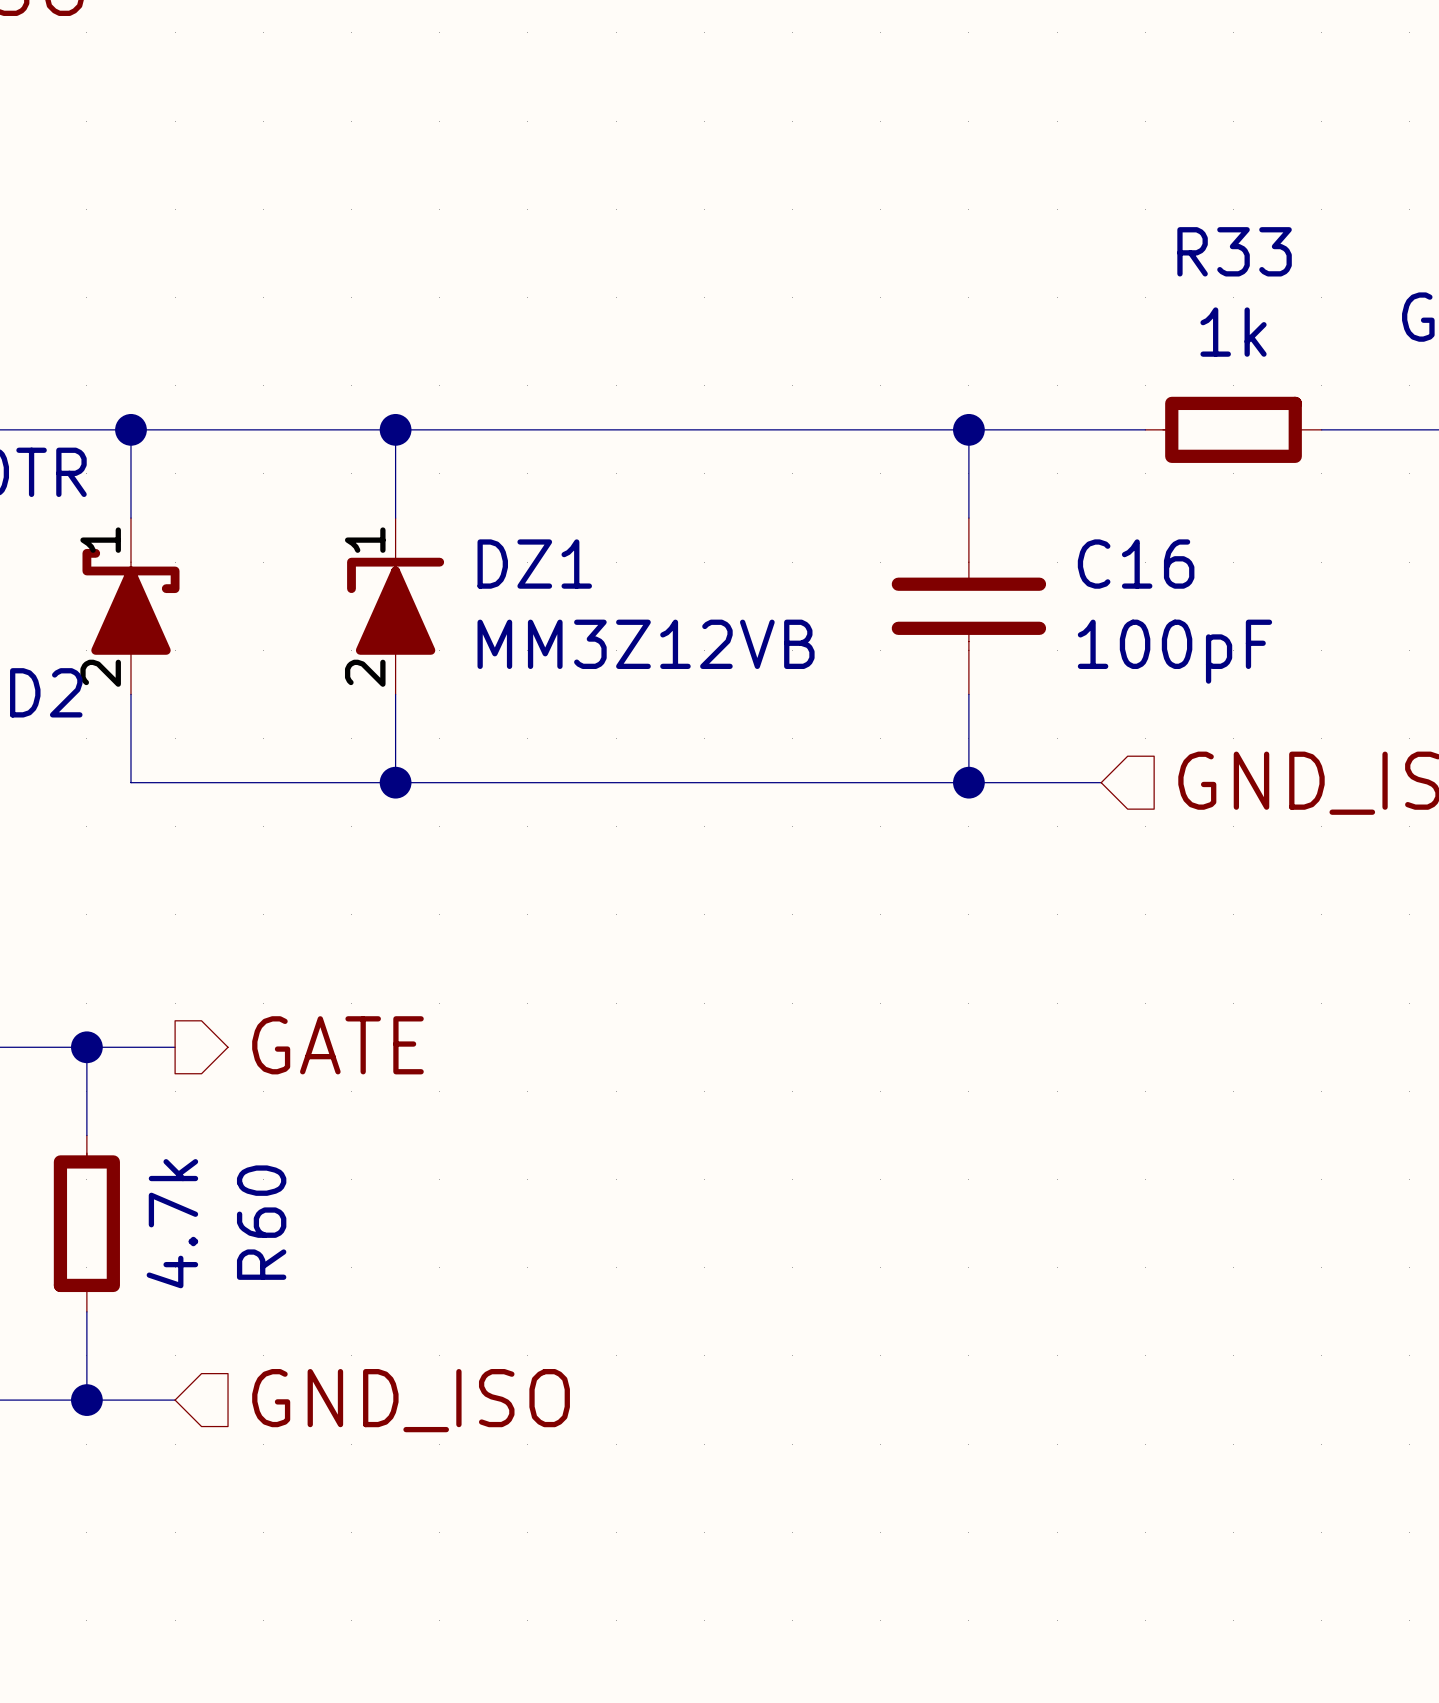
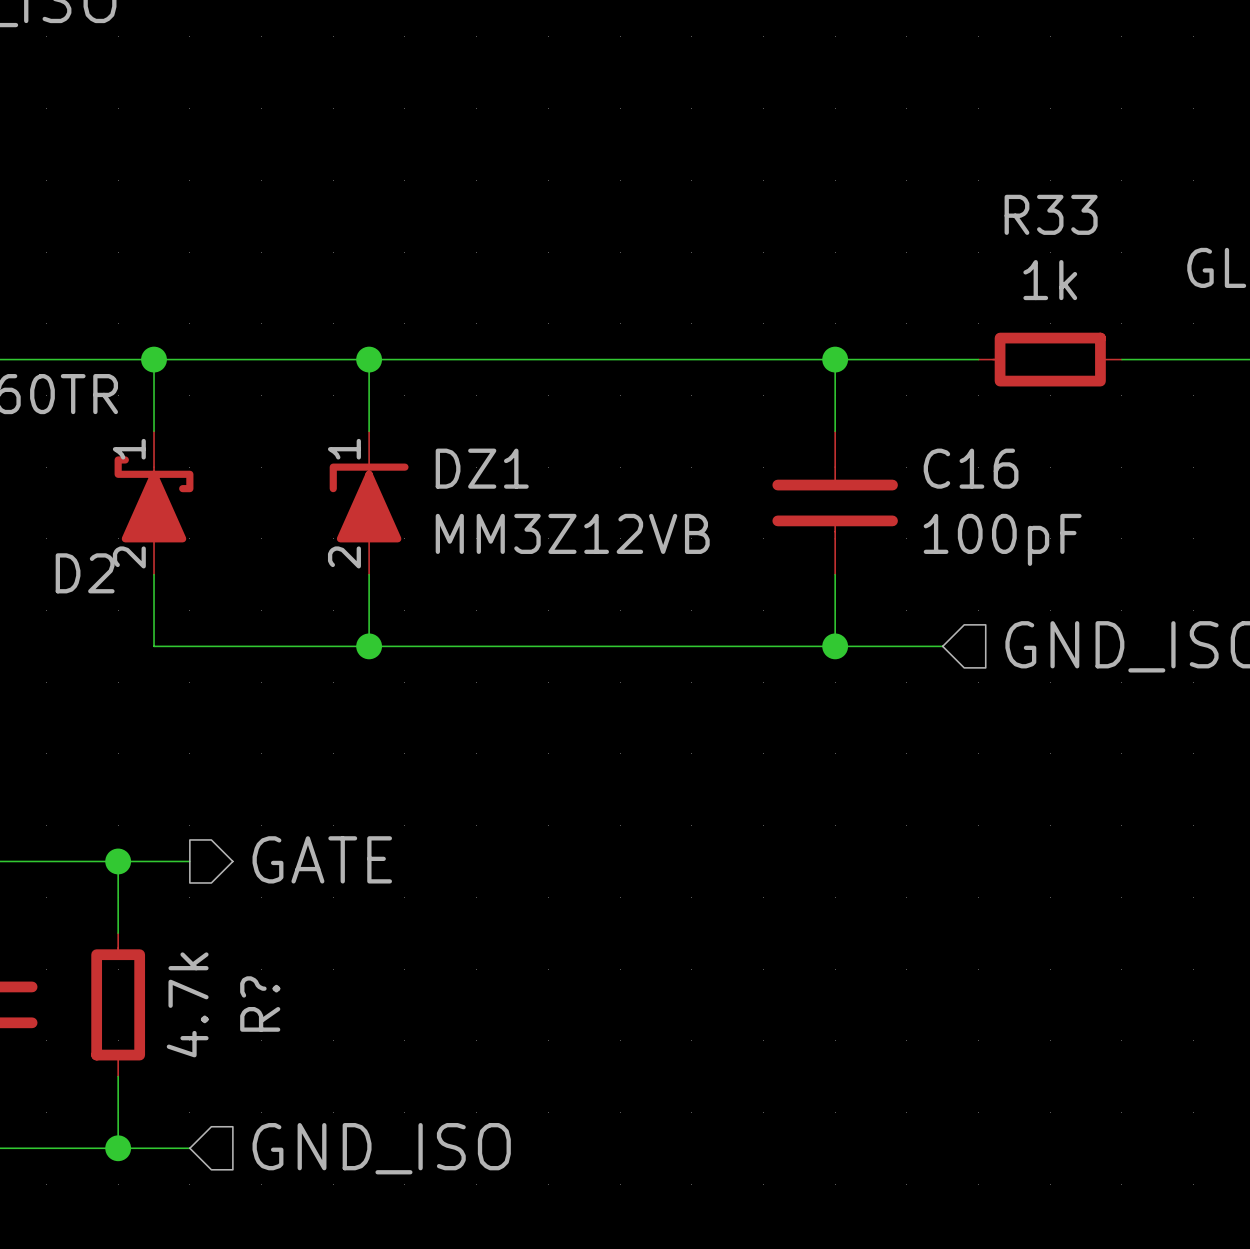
R60 name: R60 (261, 1222) -> R? (260, 1004)

